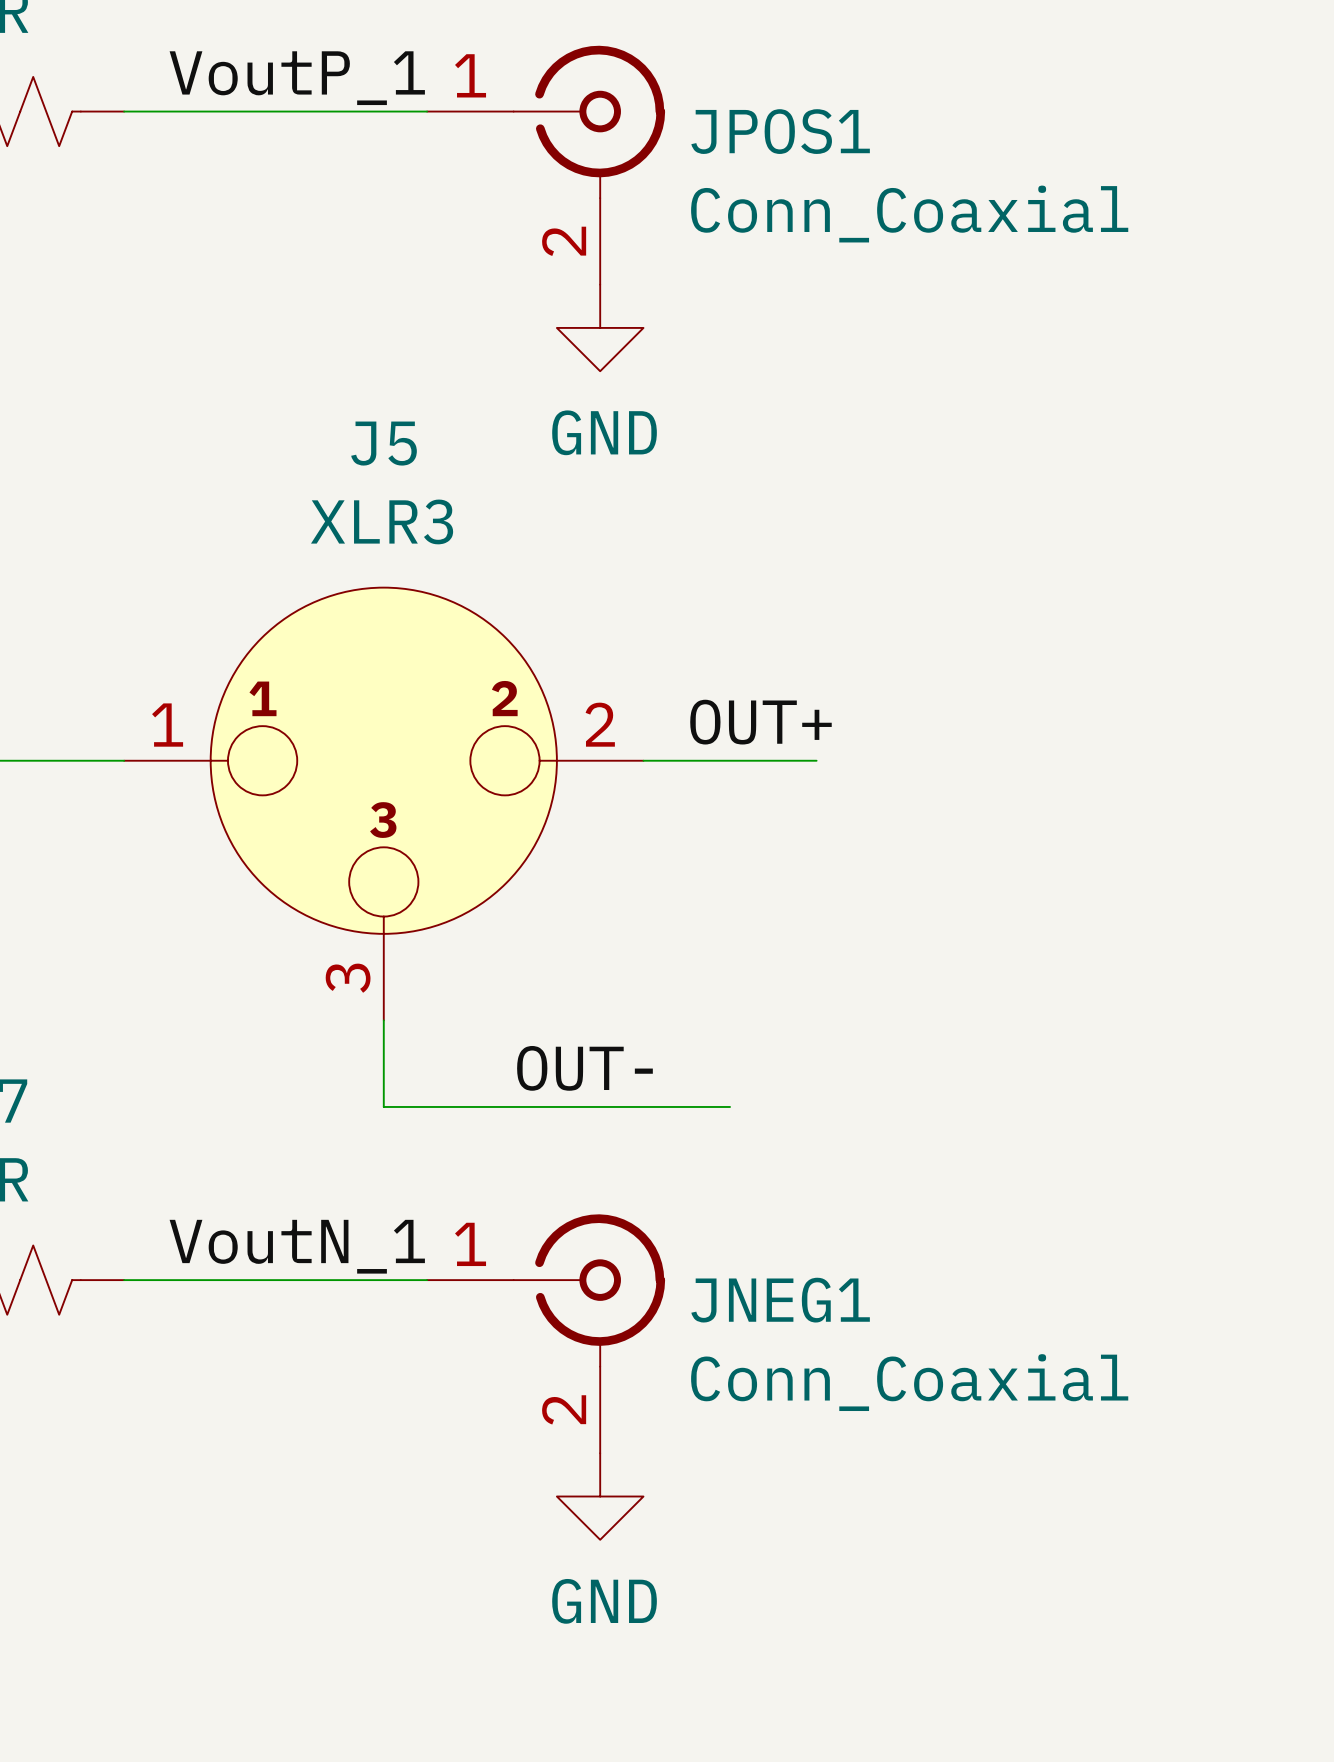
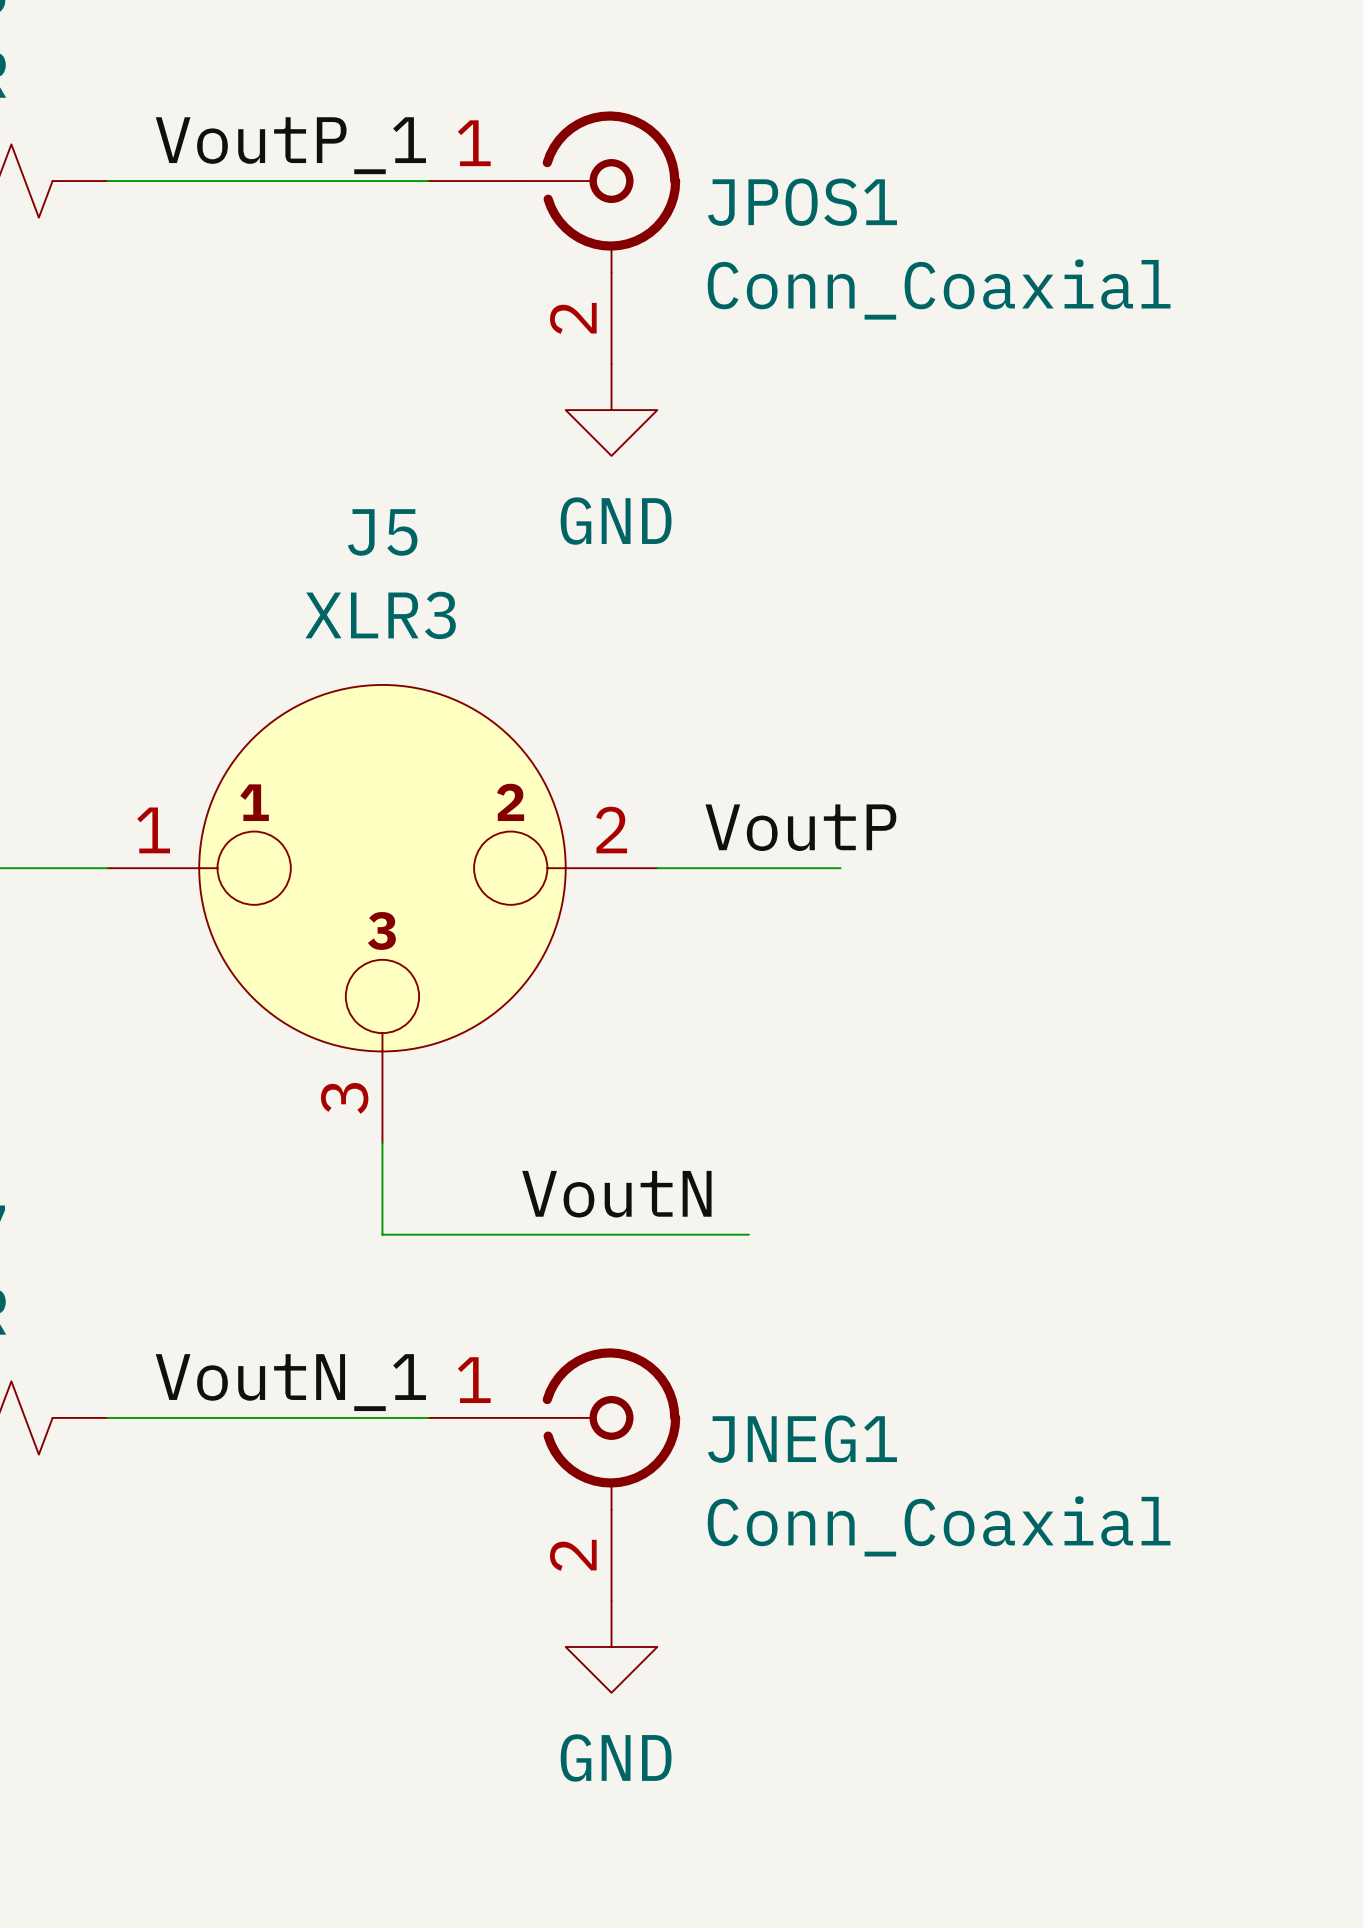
label: OUT+ (760, 722) -> VoutP (800, 827)
label: OUT- (584, 1068) -> VoutN (616, 1194)

